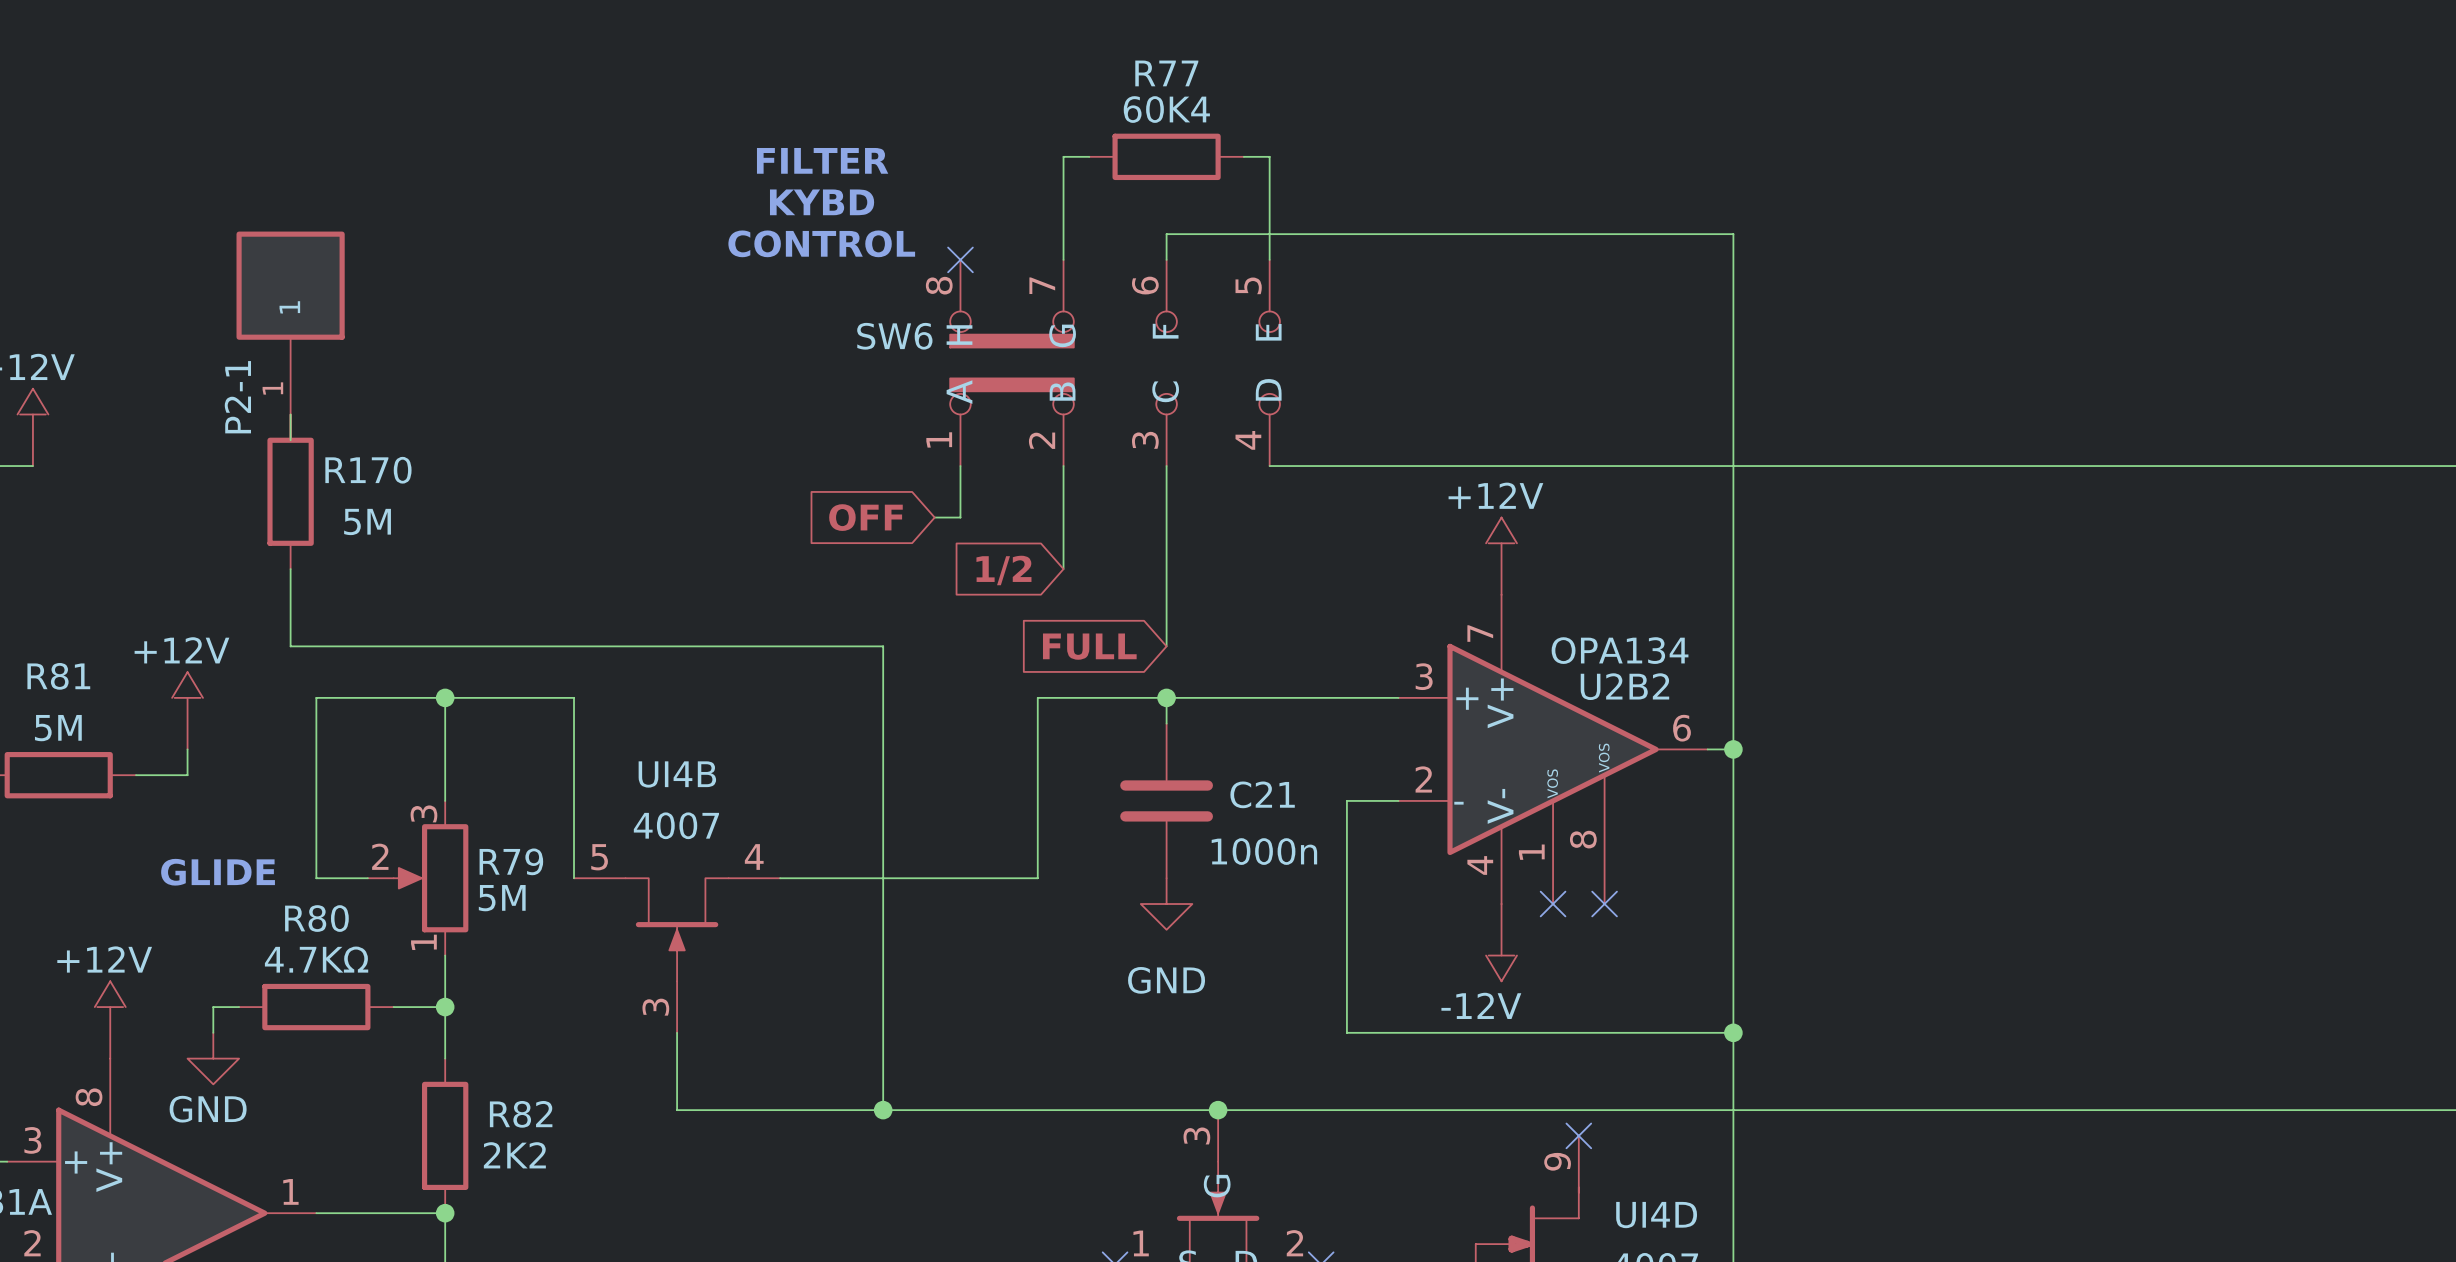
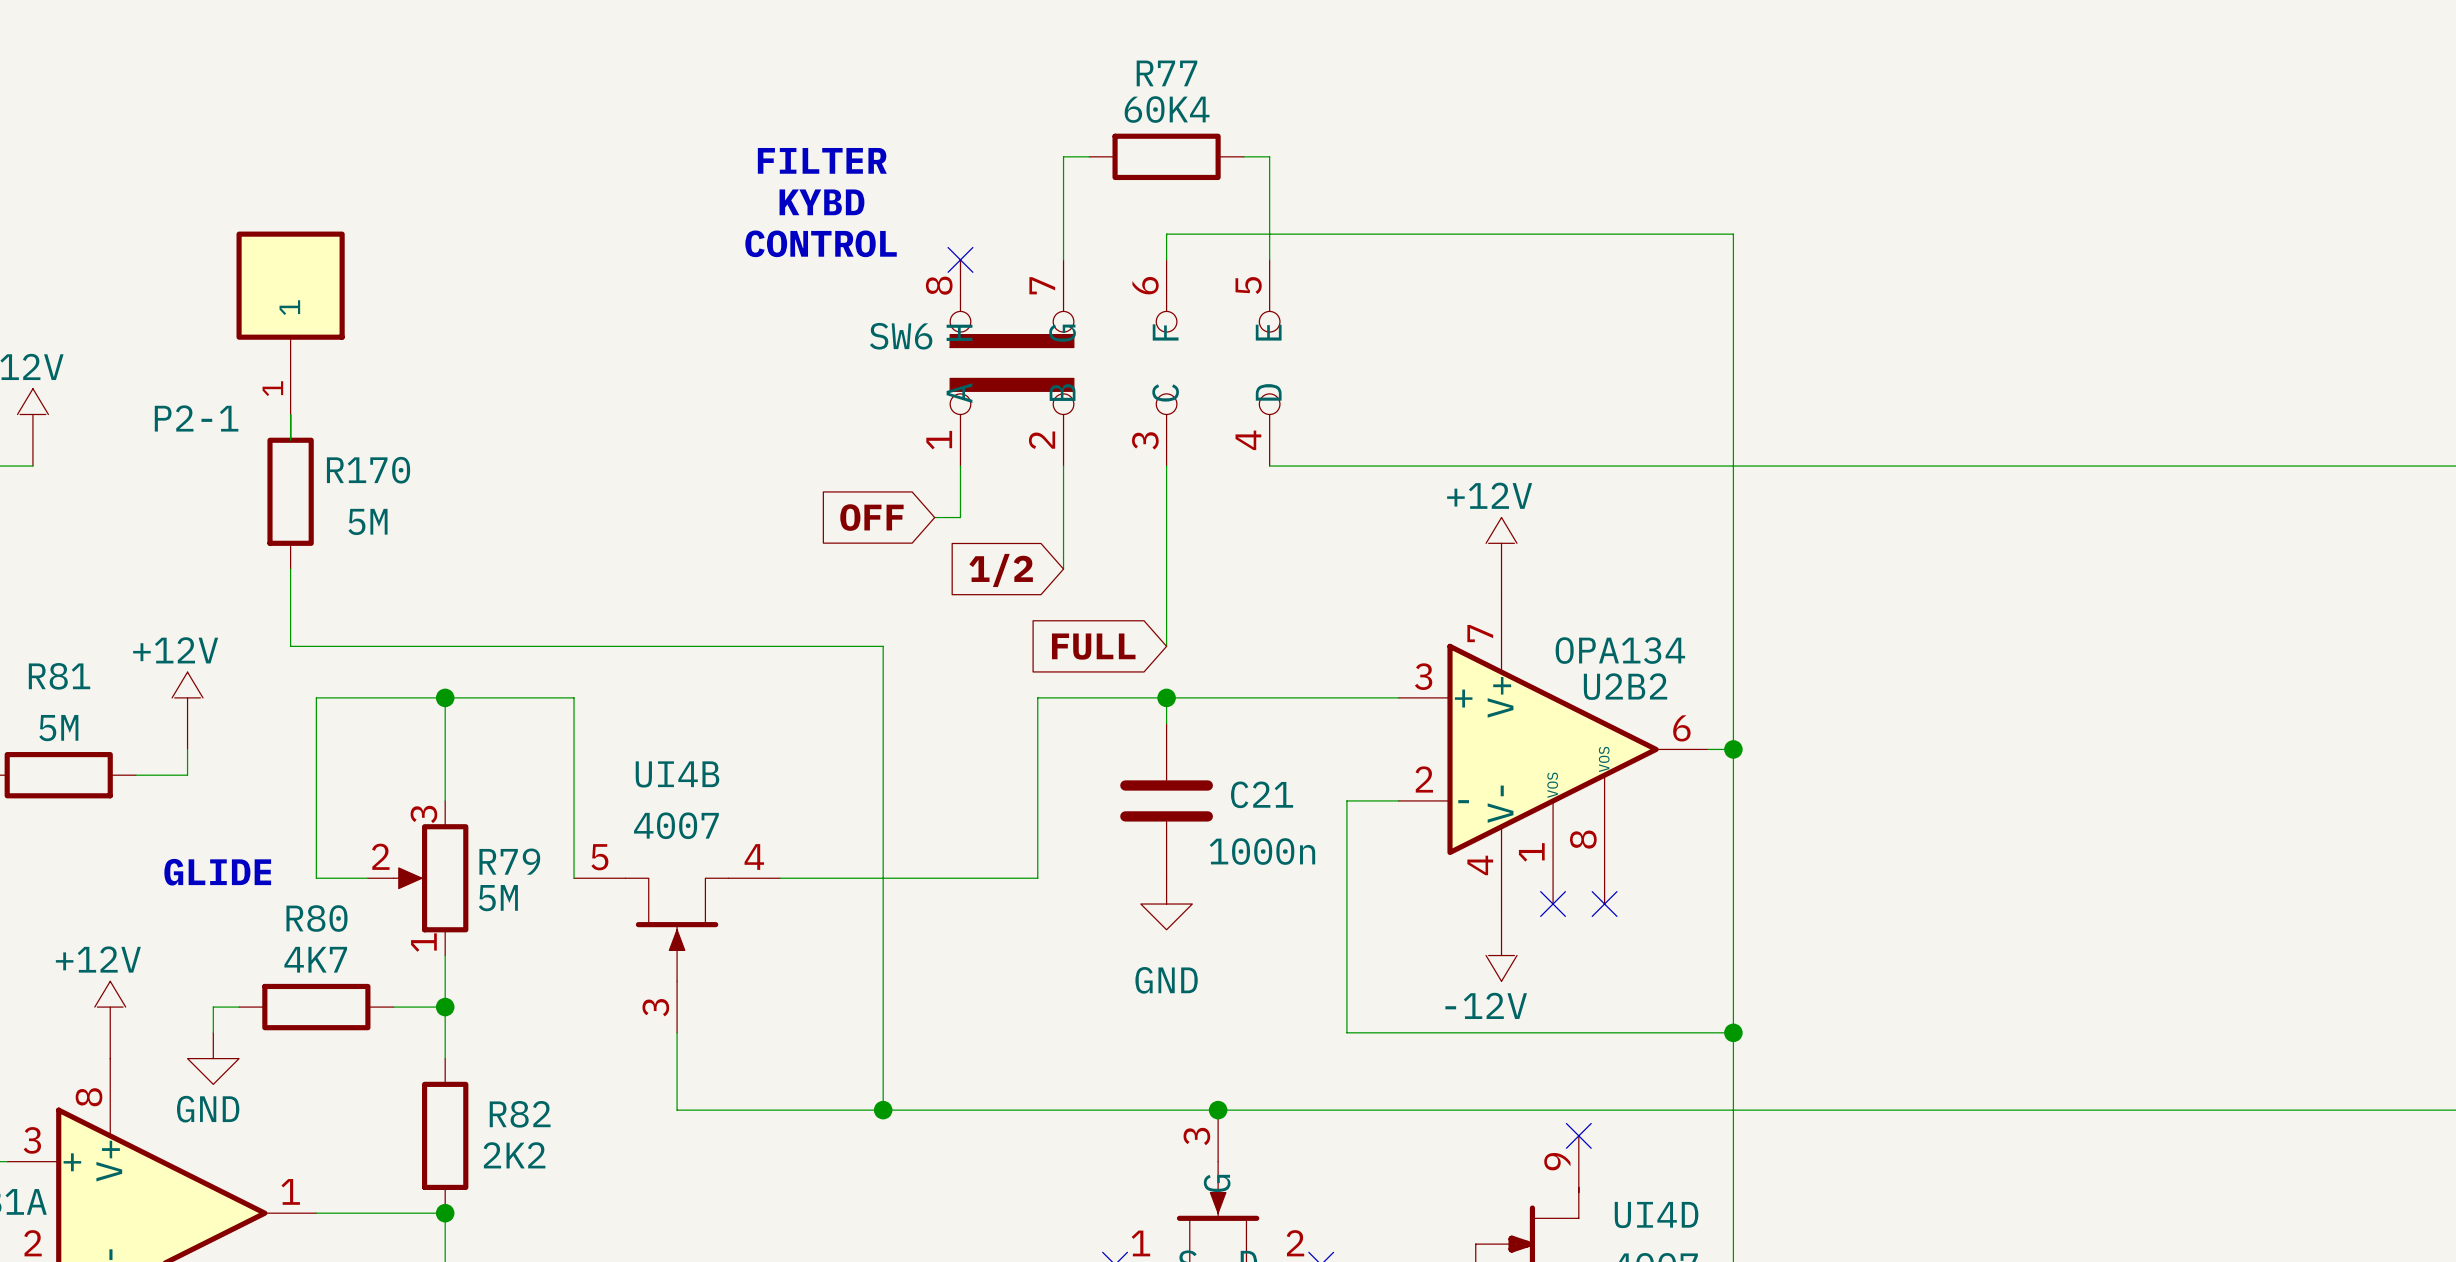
part value rotation: 0° (237, 397) -> 90° clockwise (196, 418)
R80 value: 4.7KΩ (316, 959) -> 4K7 (315, 959)

